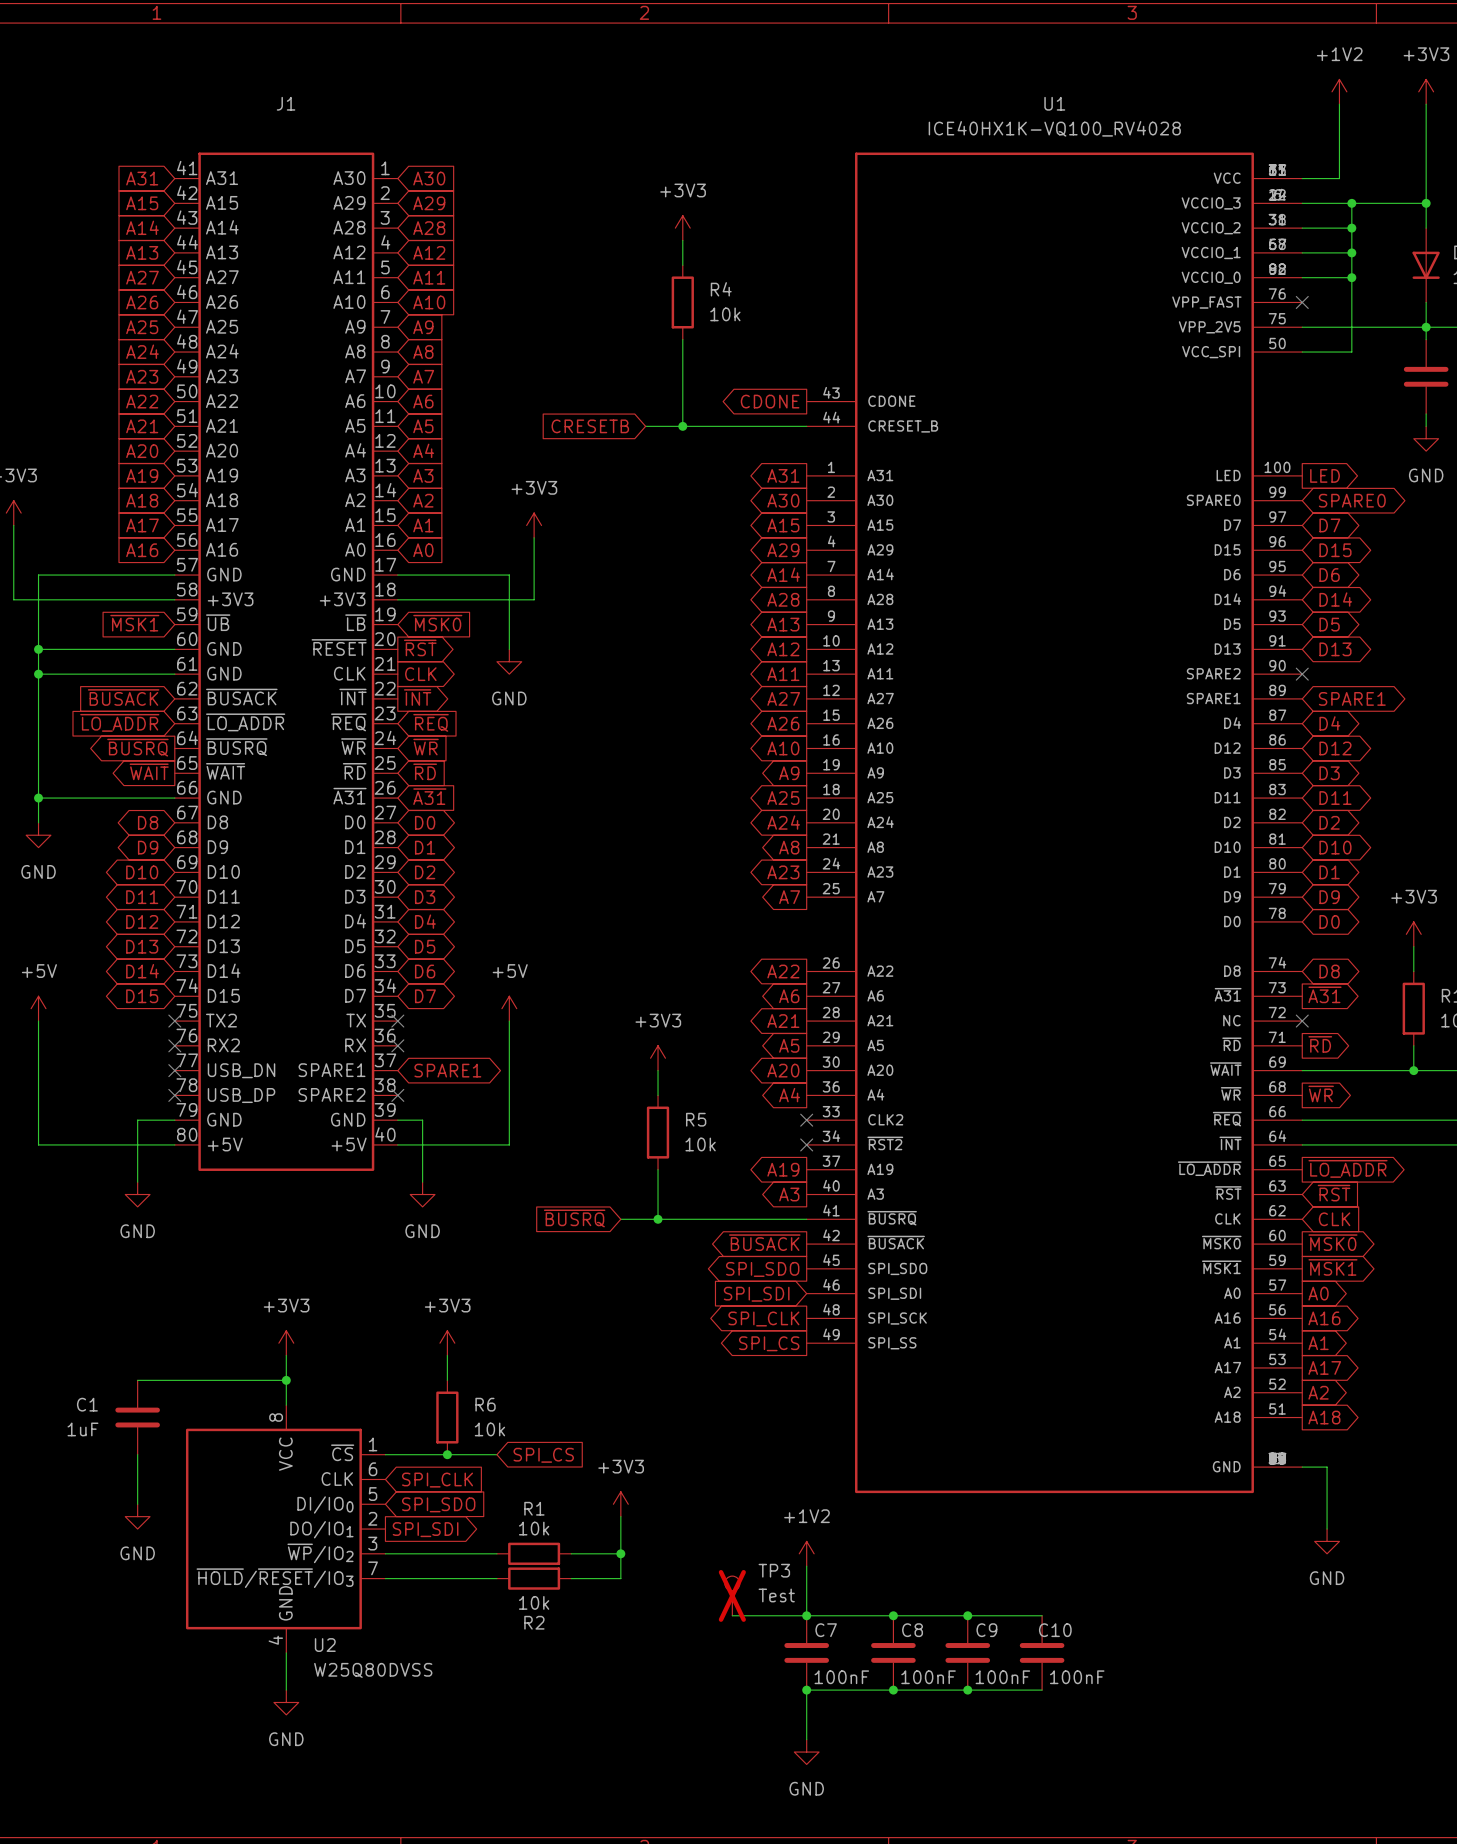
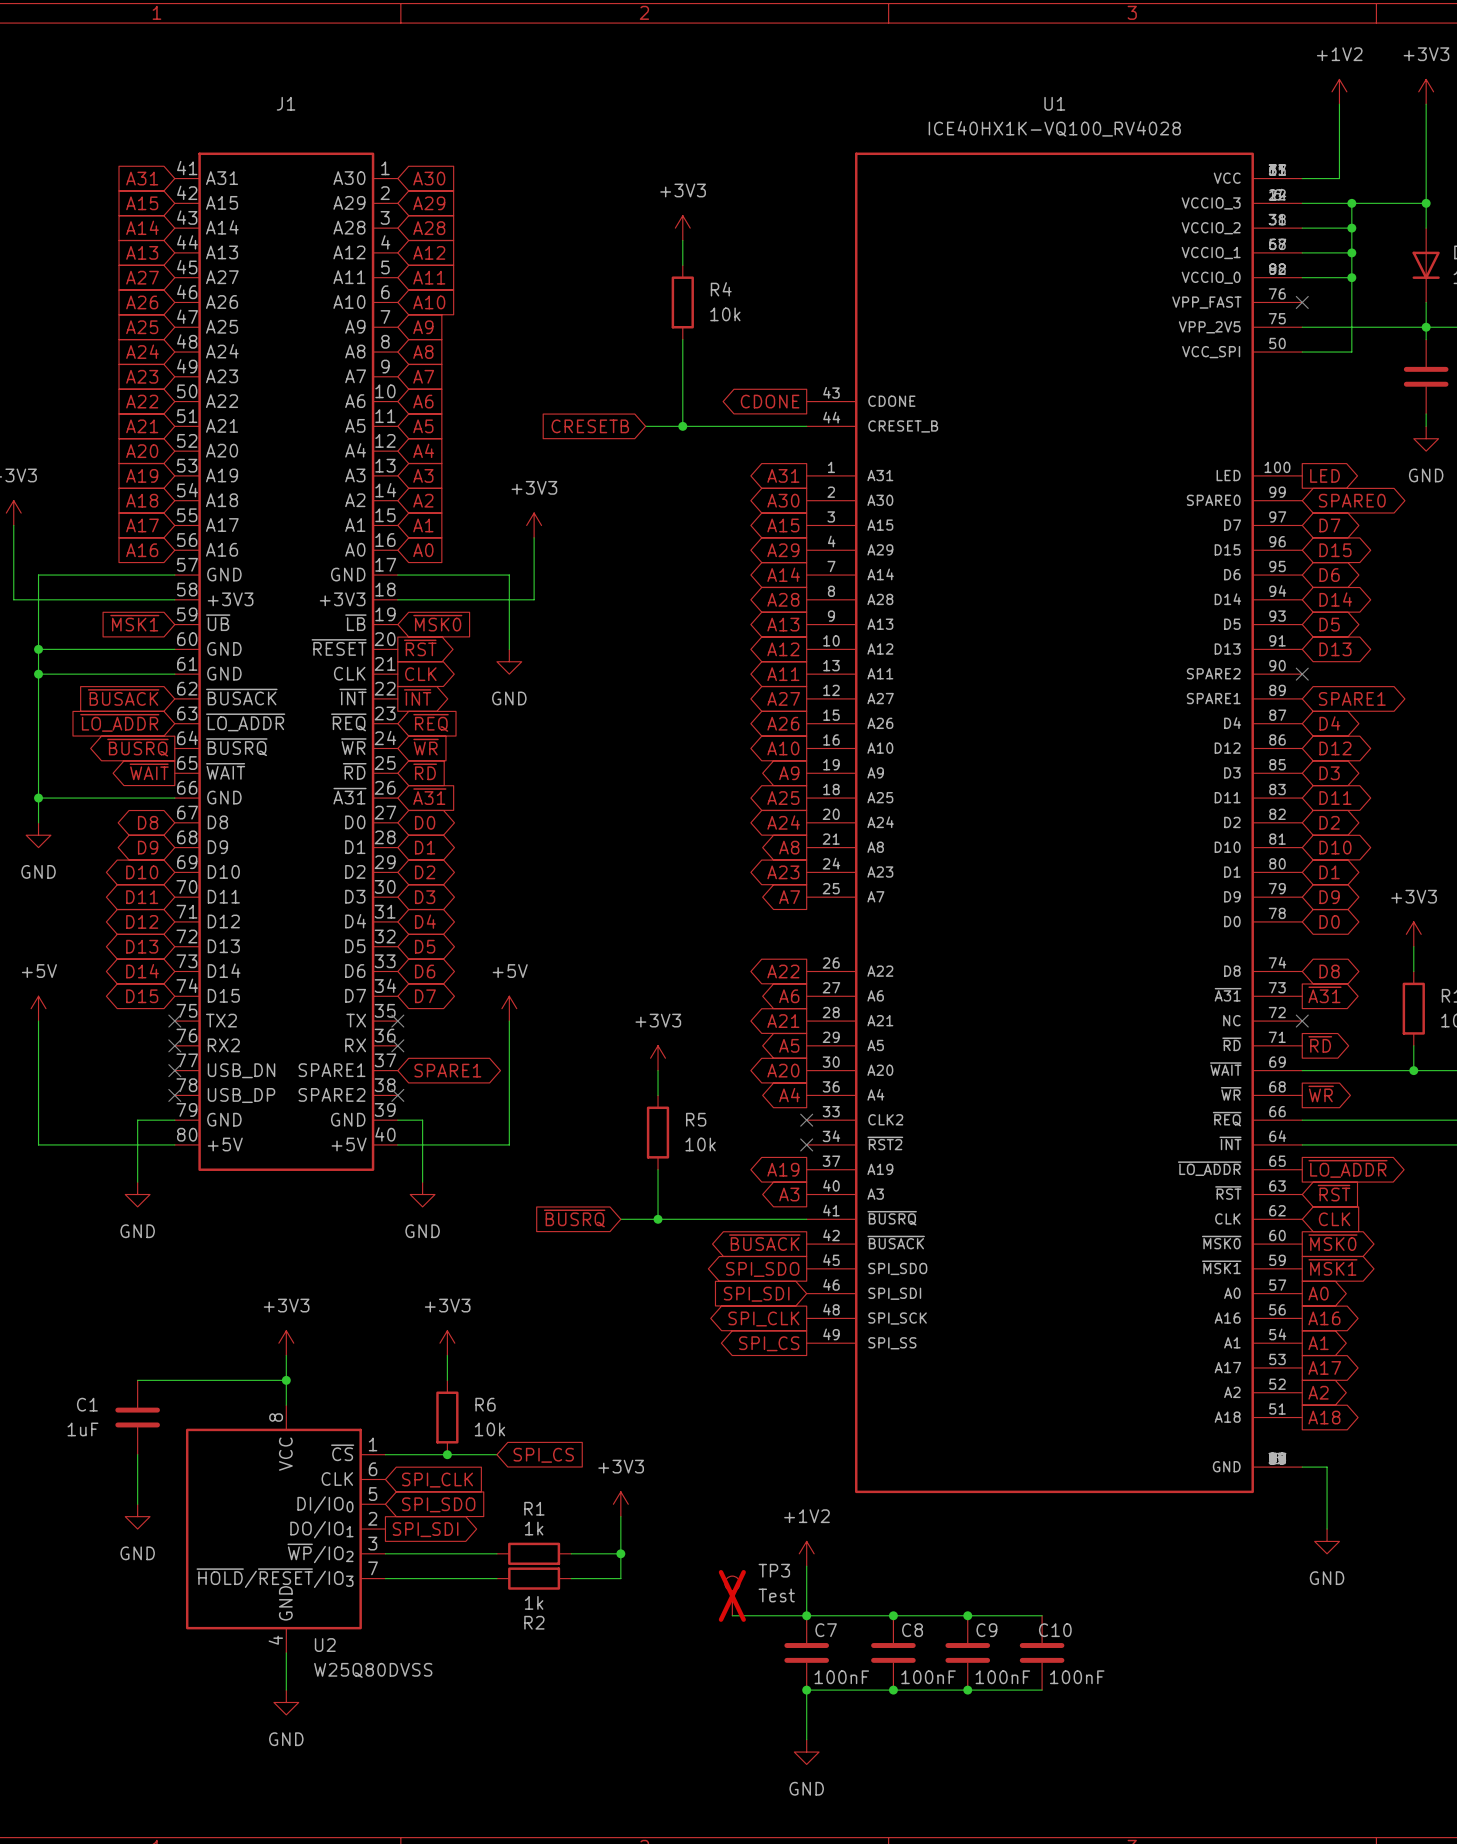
R1 value: 10k (534, 1528) -> 1k (534, 1528)
R2 value: 10k (534, 1602) -> 1k (534, 1602)

